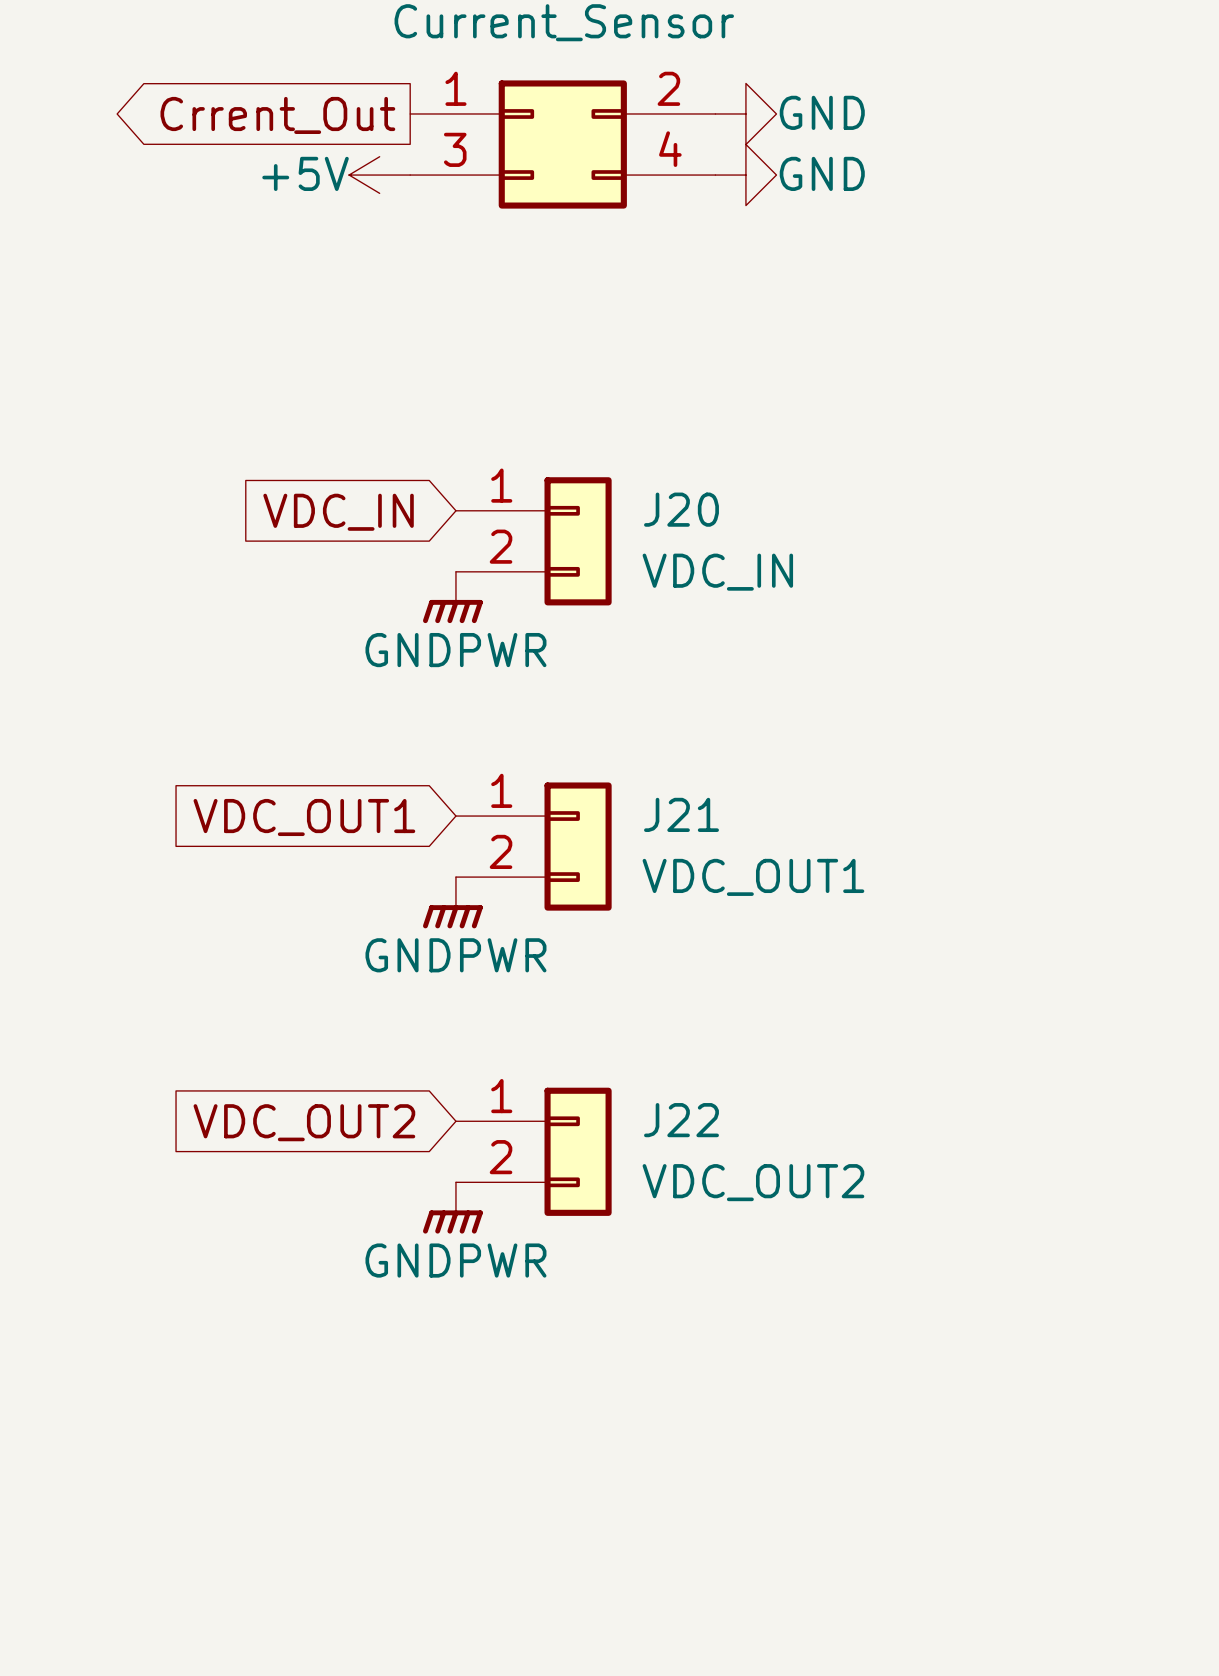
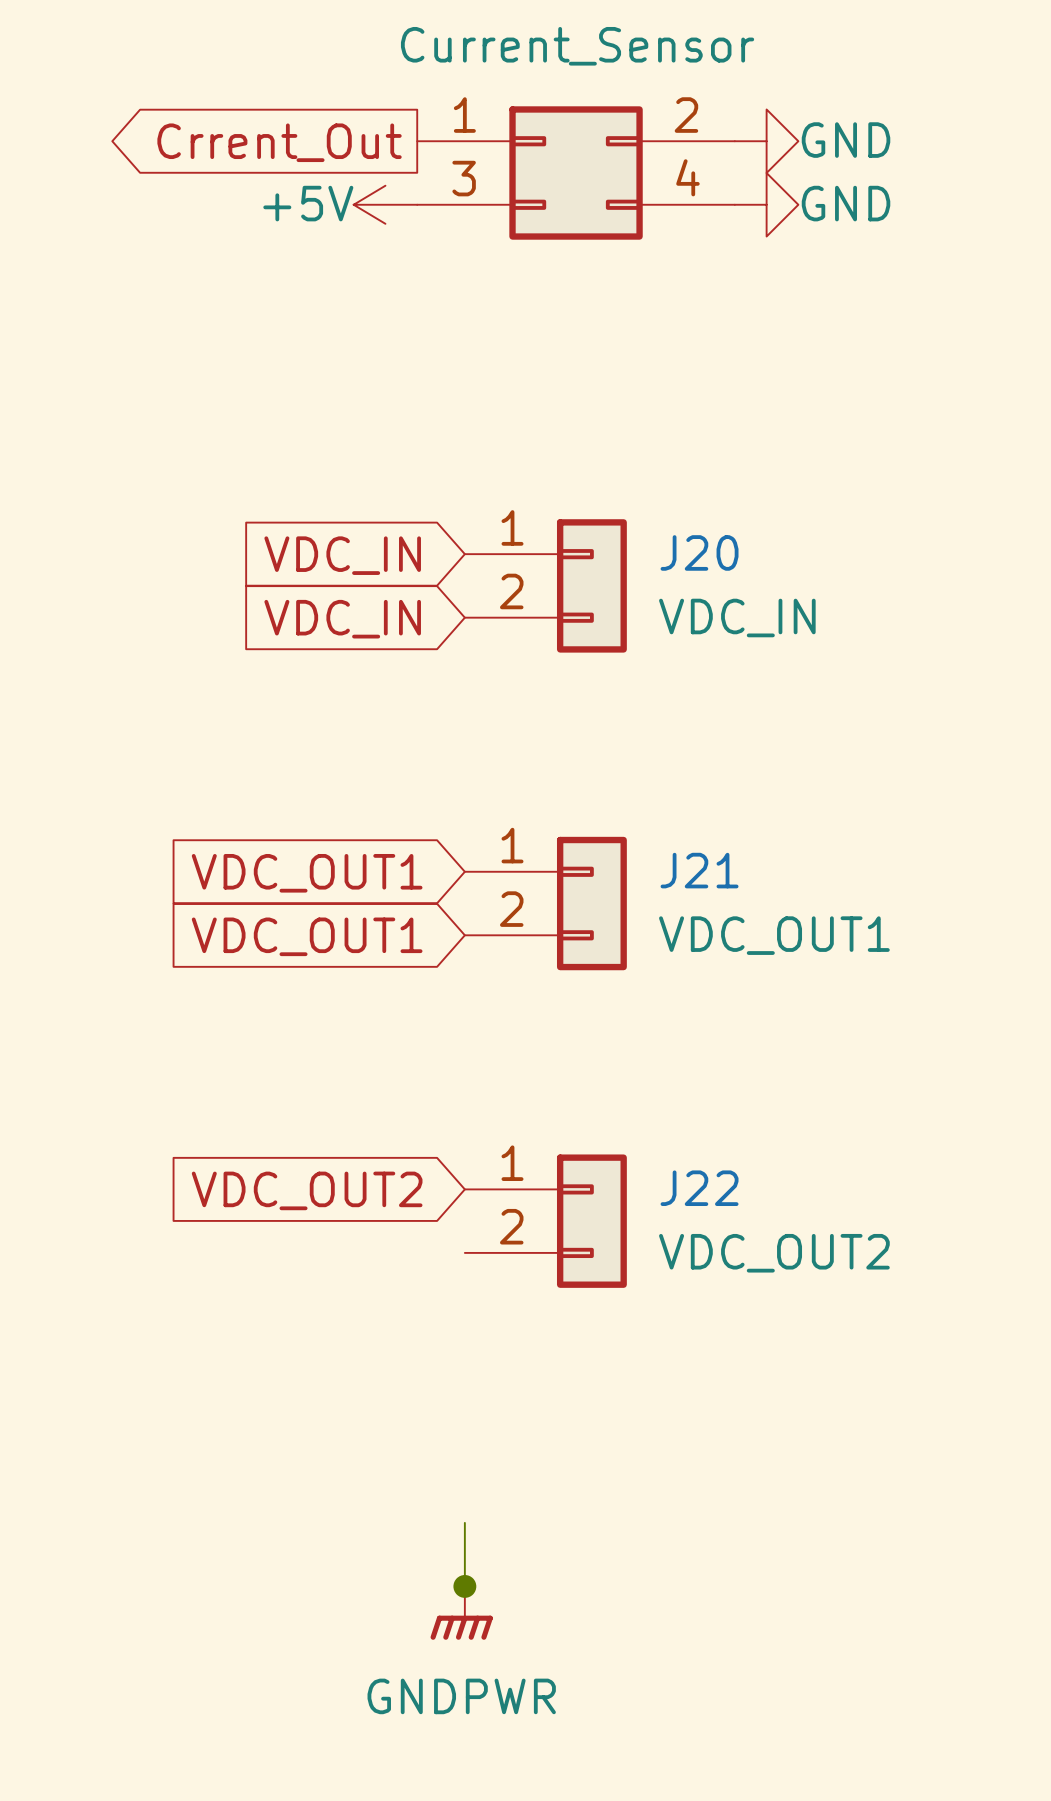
global label: none -> VDC_IN (342, 619)
power symbol: GNDPWR (452, 597) -> none
global label: none -> VDC_OUT1 (307, 936)
power symbol: GNDPWR (452, 902) -> none
power symbol: GNDPWR (452, 1207) -> none
wire: none -> (464, 1522) (464, 1586)
junction: none -> (464, 1586)
power symbol: none -> GNDPWR (461, 1613)

